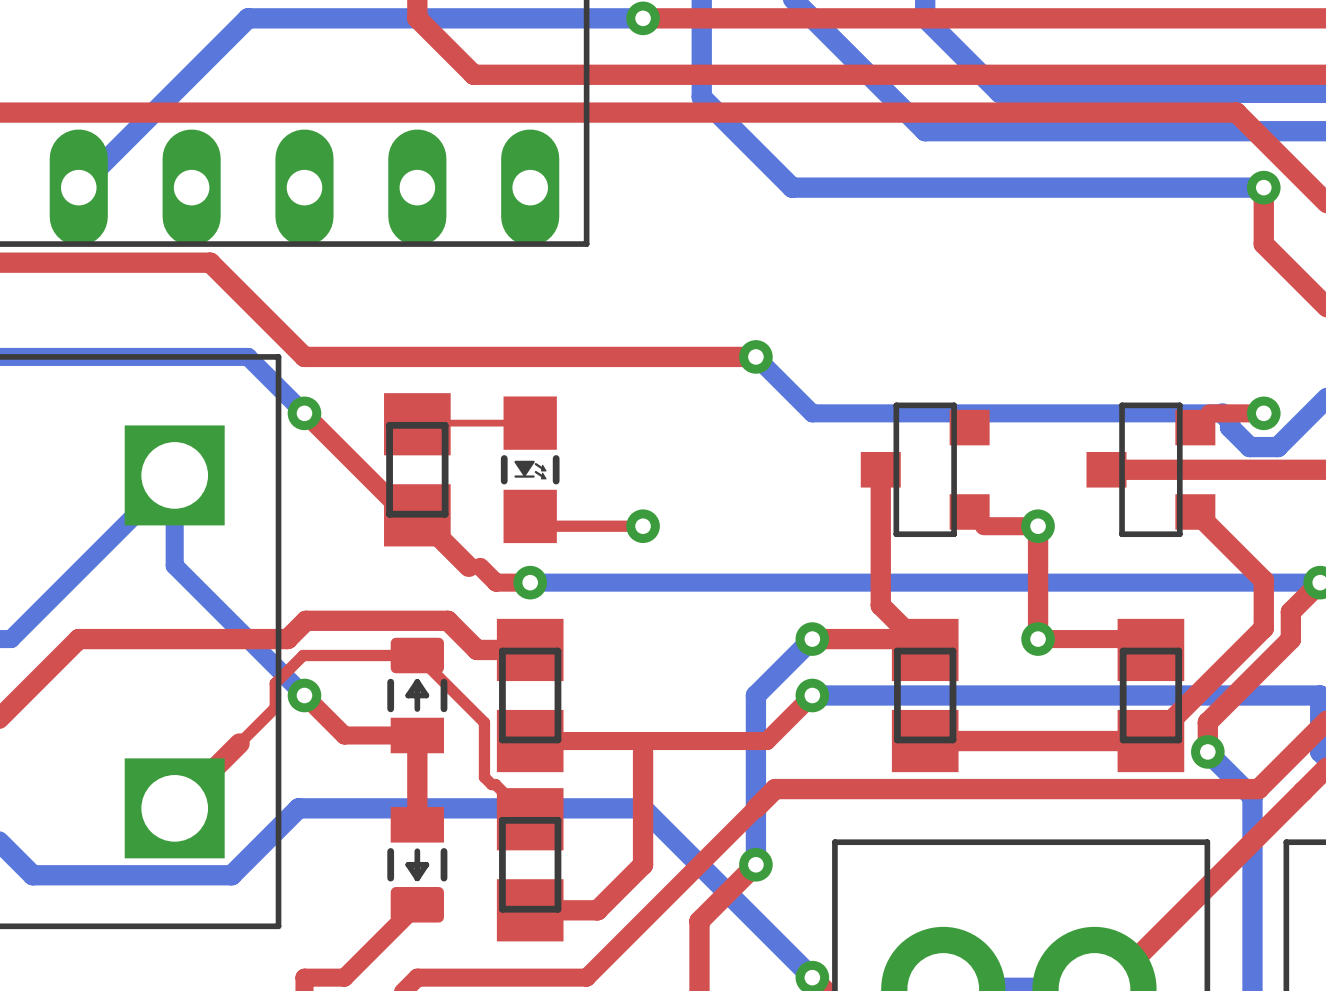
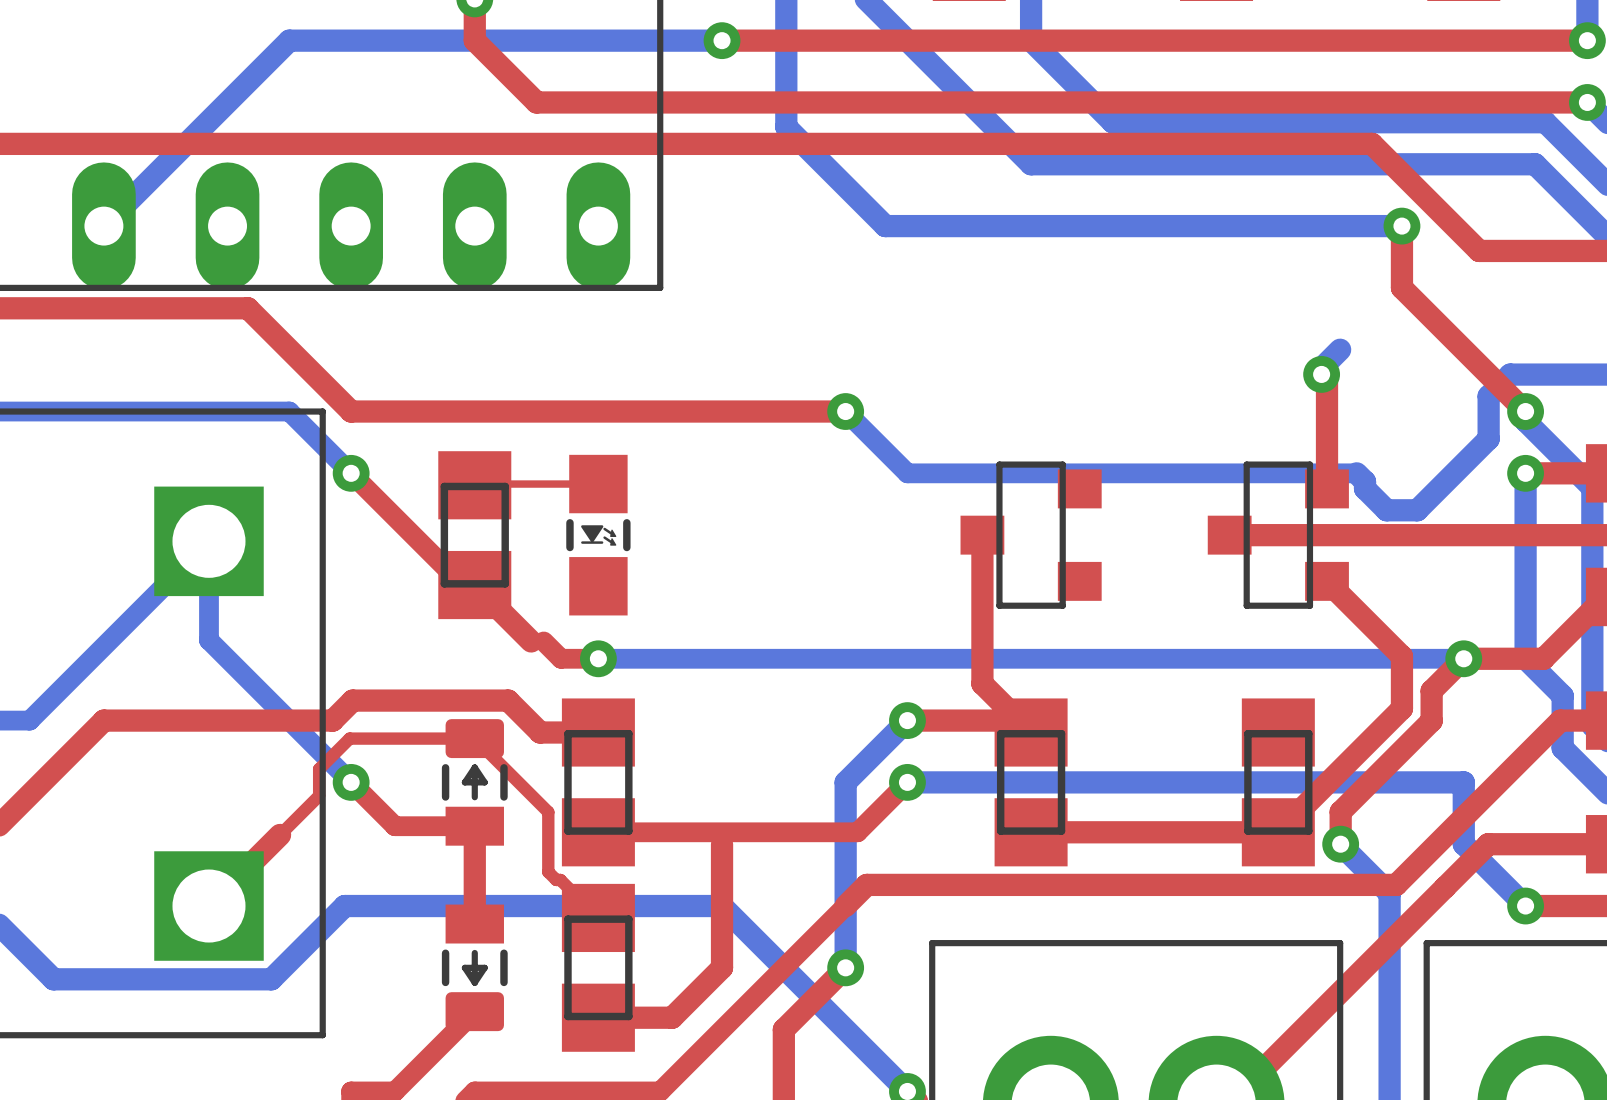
bottom track: none -> (1340, 349) (1321, 368) (1321, 374)
top track: (1263, 413) (1209, 413) (1195, 427) -> (1321, 374) (1327, 379) (1327, 488)
via position: (1263, 413) -> (1321, 374)
top track: (969, 511) (983, 526) (1038, 526) (1038, 639) (1140, 639) (1150, 649) -> none
top track: (530, 516) (539, 526) (643, 526) -> none
via: (643, 526) -> none
via: (1038, 526) -> none
via: (1038, 639) -> none

